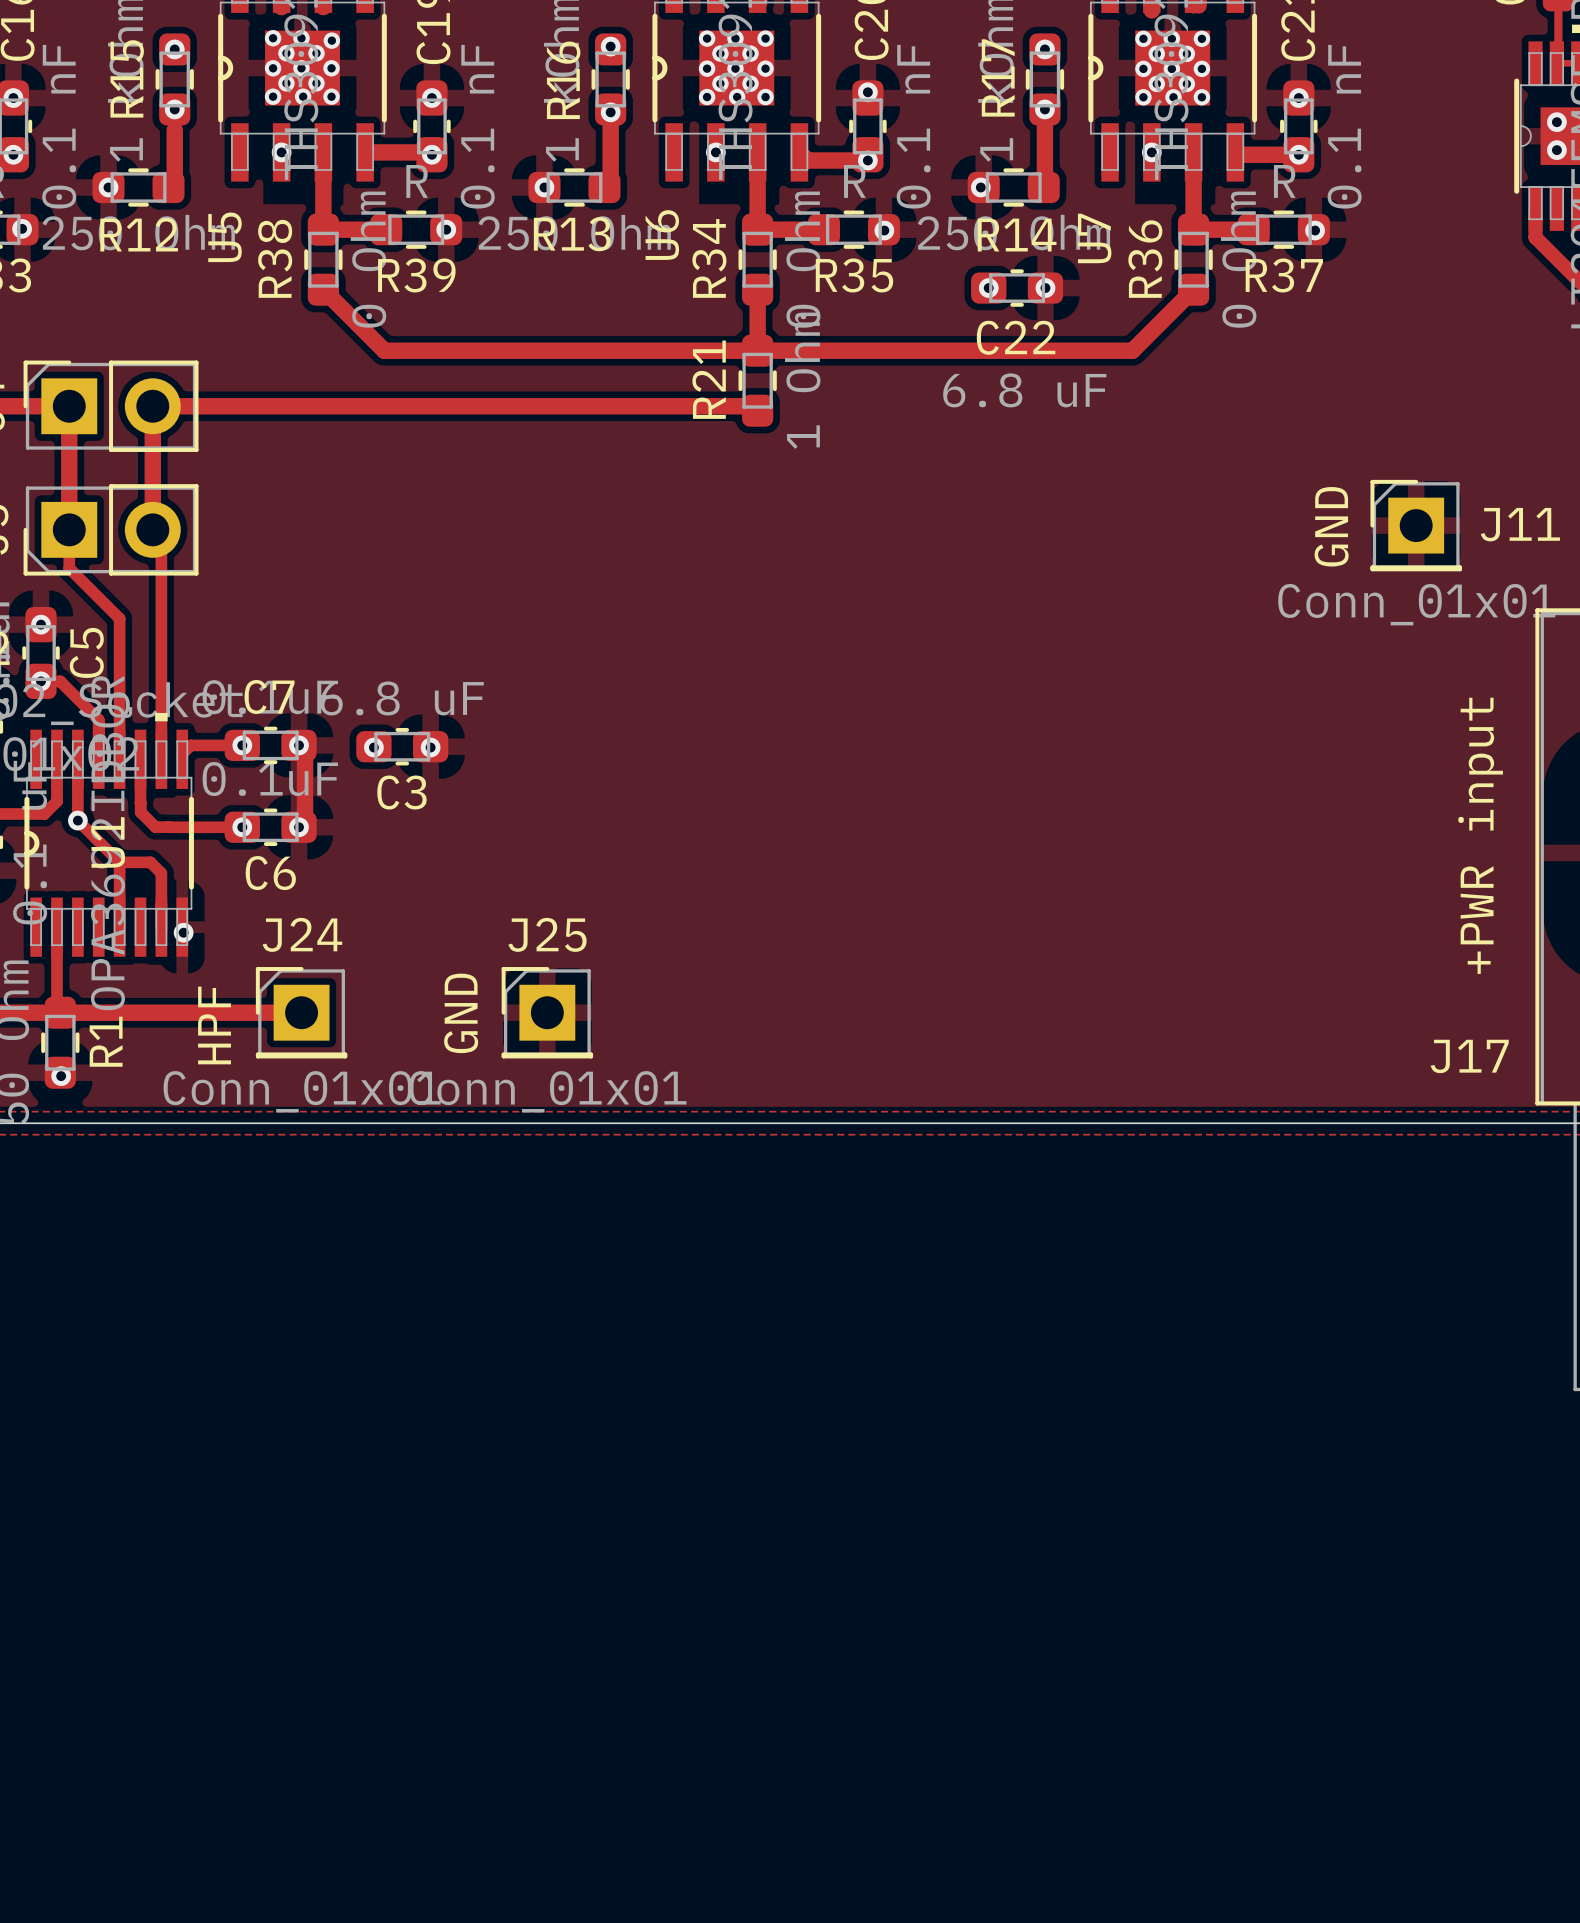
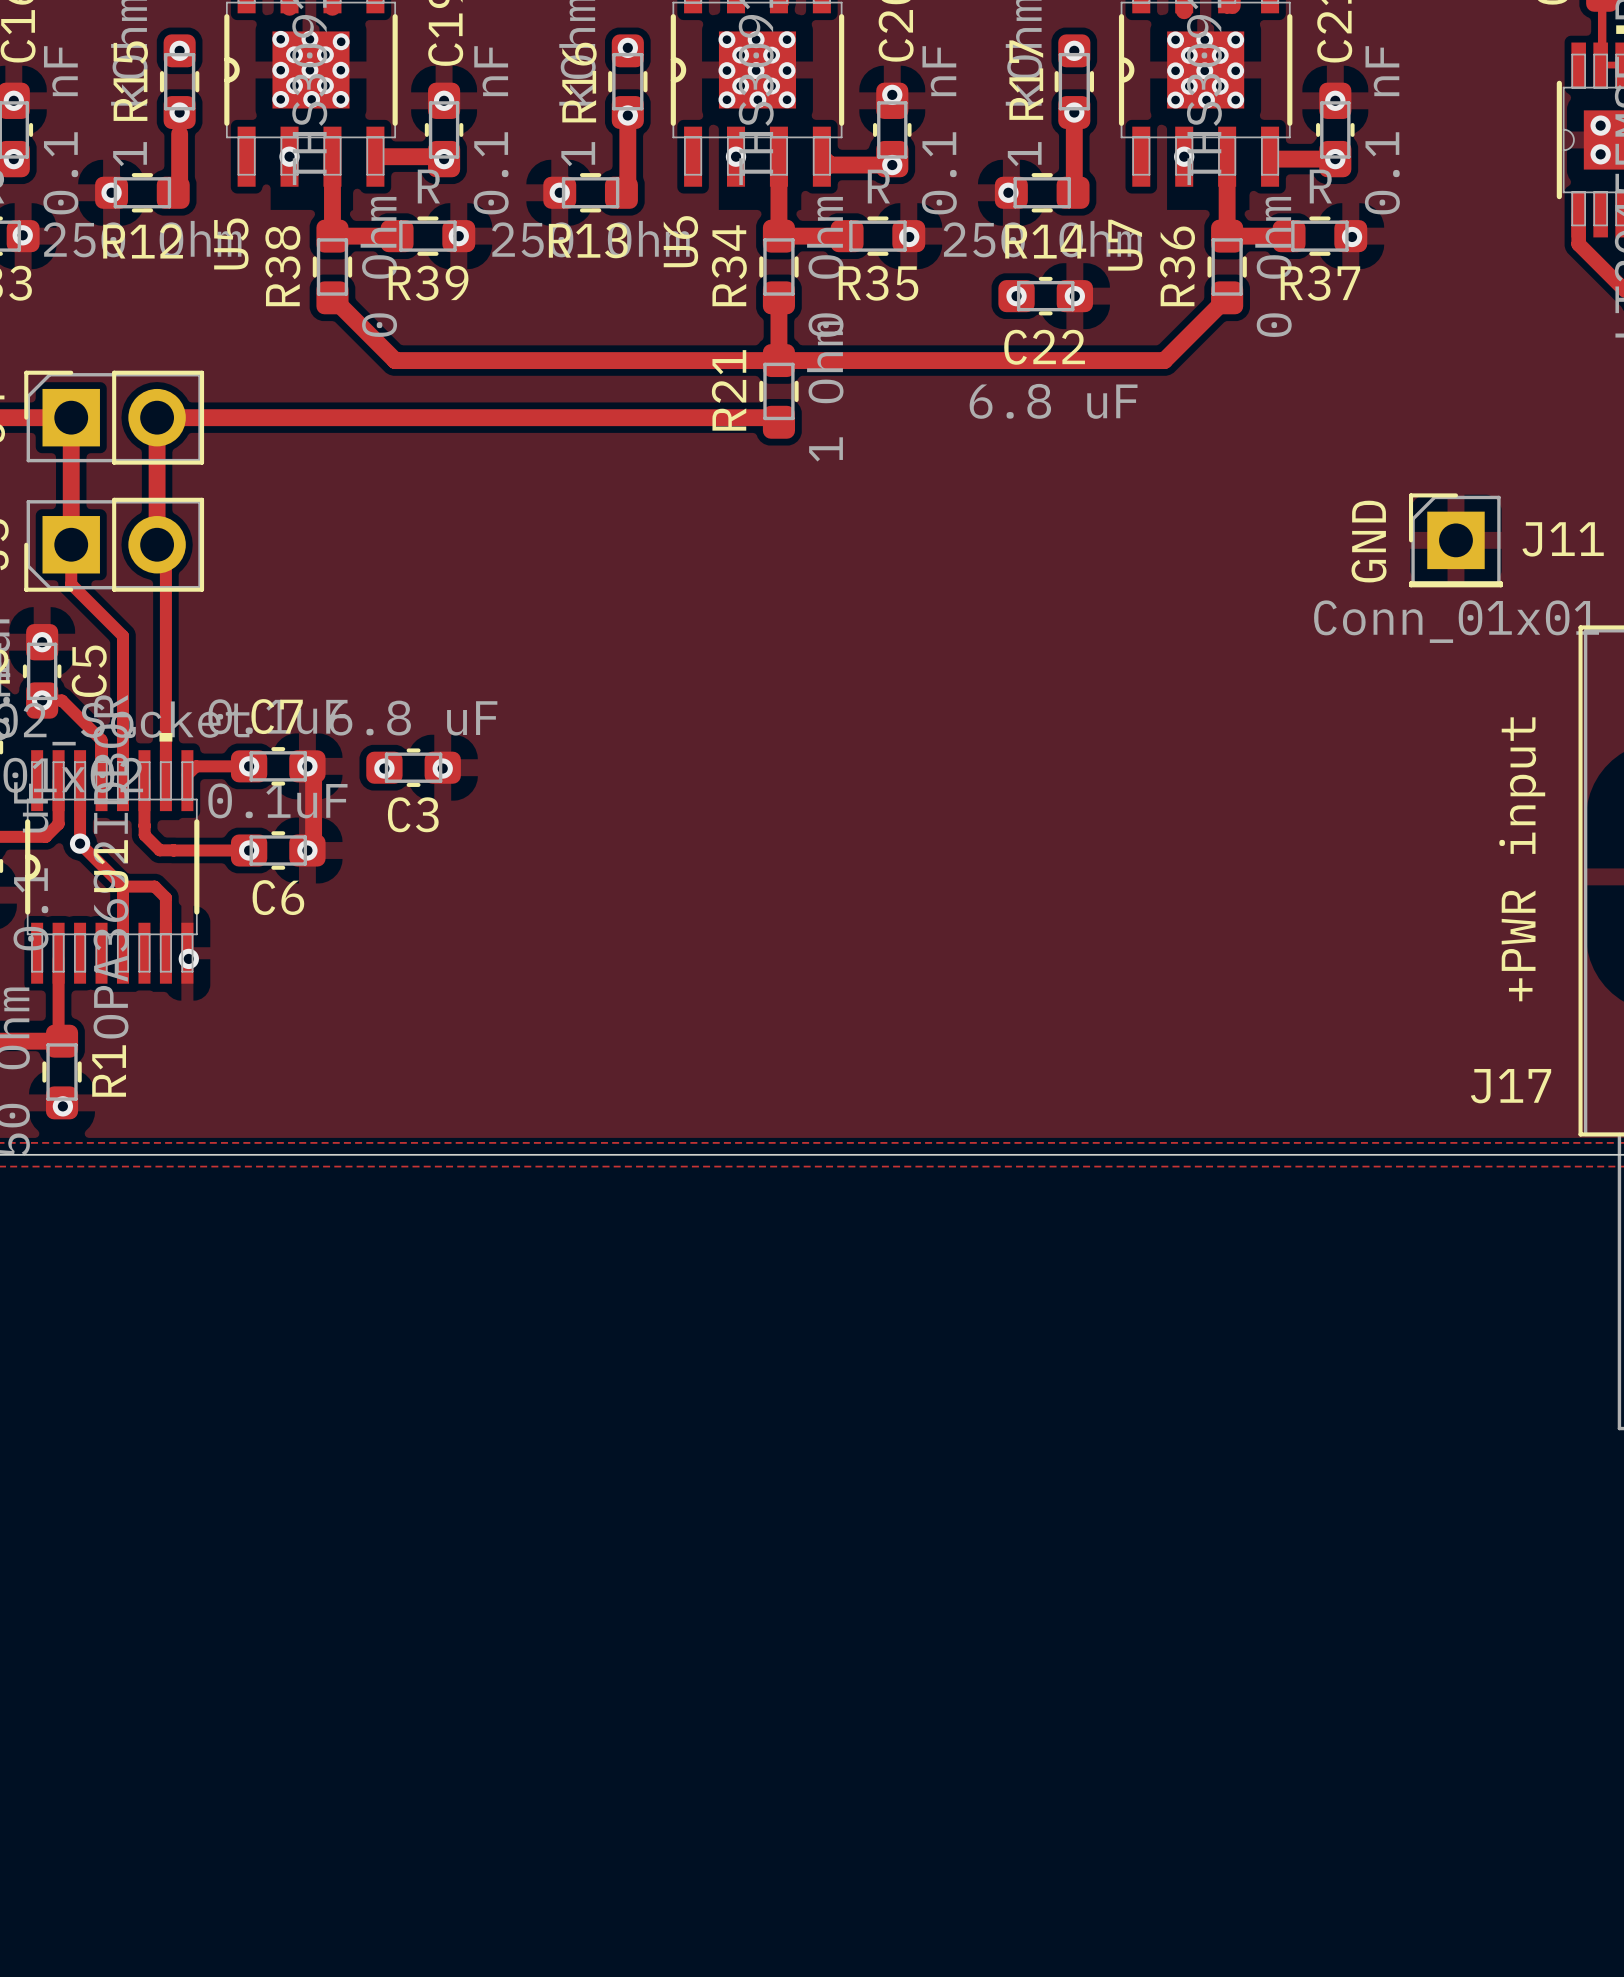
track: (60, 1012) (301, 1012) -> none
J24: Conn_01x01 (301, 1012) -> none
J25: Conn_01x01 (547, 1012) -> none
text: GND (461, 1013) -> none
text: HPF (214, 1025) -> none

